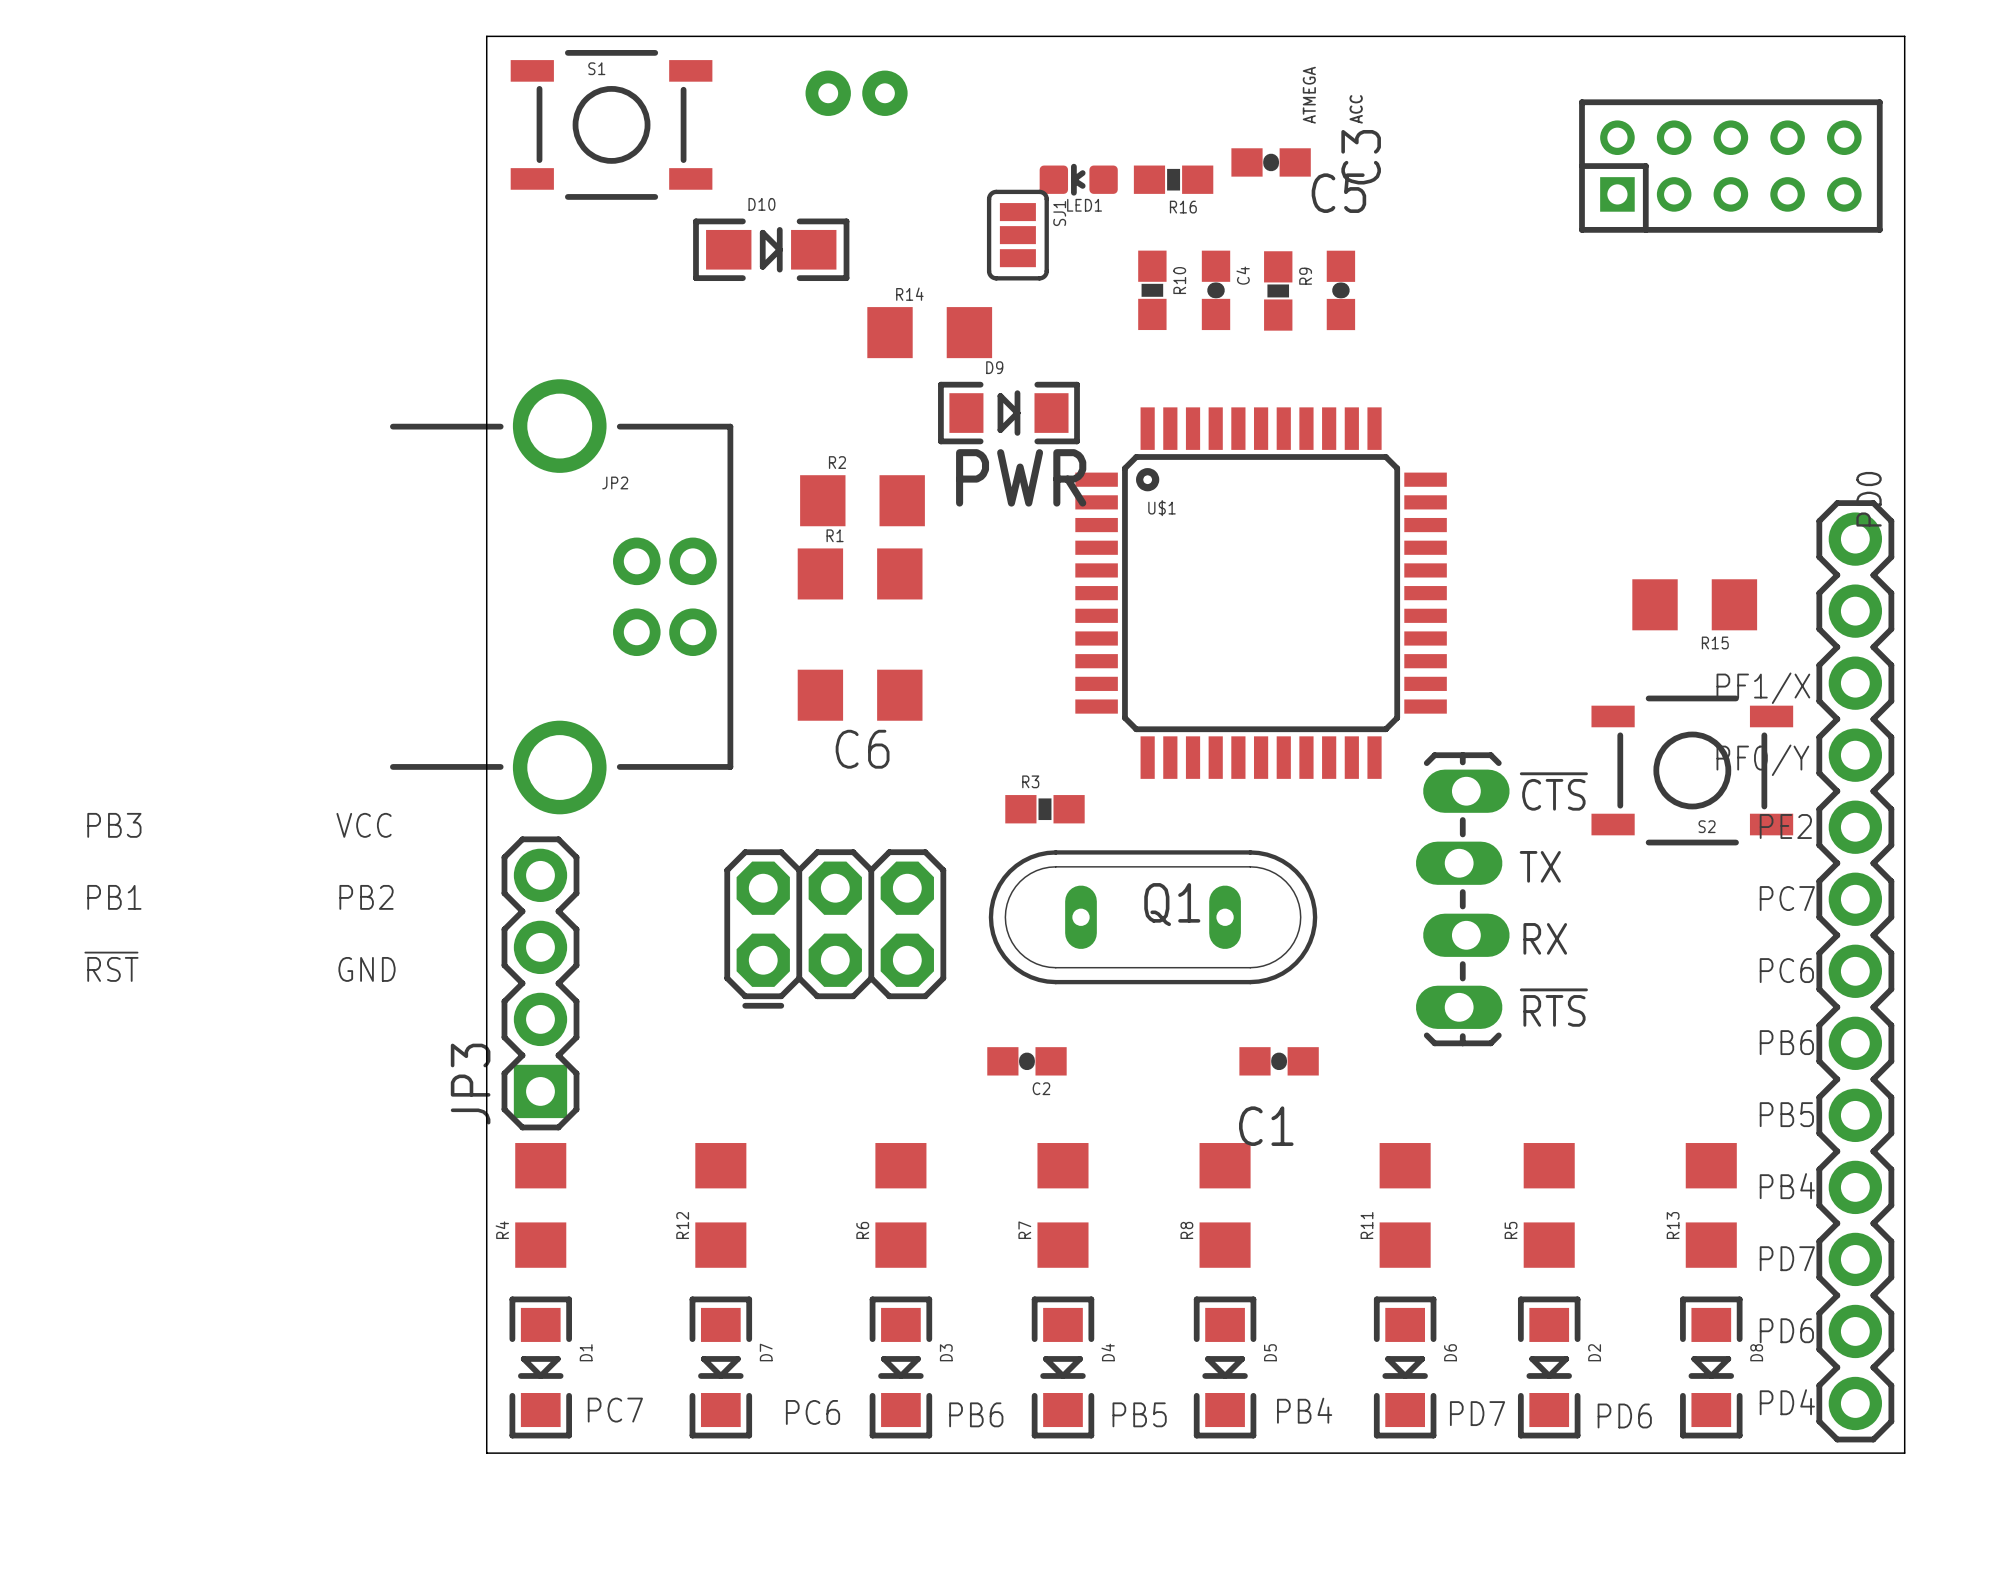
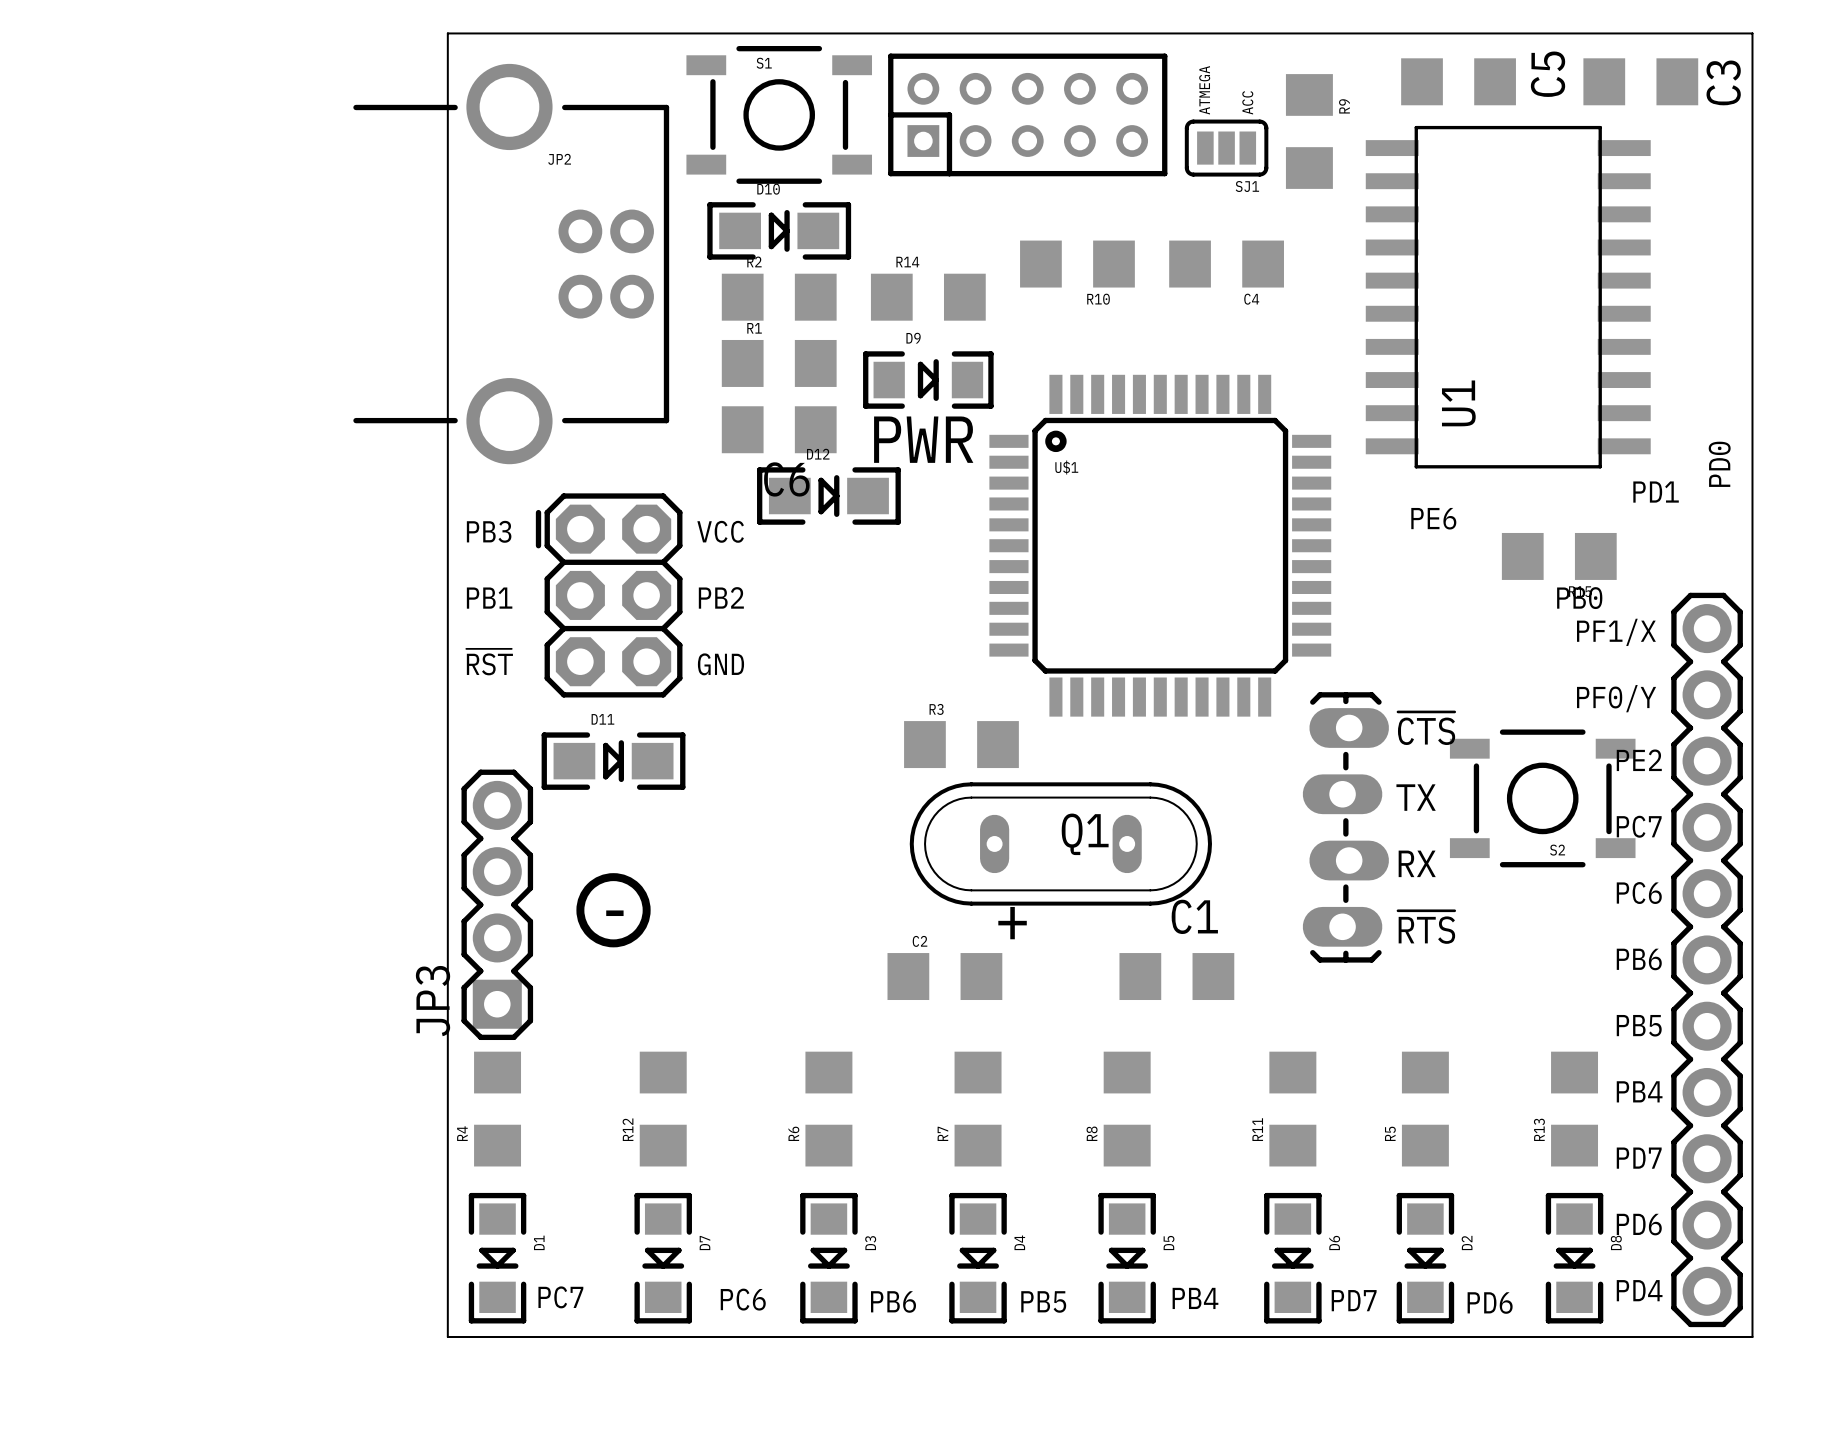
part: (856, 93) -> none
S1 position: (611, 124) -> (779, 114)
C3 footprint: [1231, 148, 1311, 177] -> [1583, 58, 1699, 106]
part position: (1730, 166) -> (1027, 114)
LED1: (1078, 179) -> none
R16: (1173, 179) -> none
C5 name position: C5 (1338, 193) -> C5 (1548, 74)
SJ1 rotation: 0° (1017, 235) -> 90° clockwise (1226, 148)
SJ1 position: (1017, 235) -> (1226, 148)
D10 position: (771, 249) -> (779, 230)
R10 footprint: [1138, 250, 1167, 331] -> [1020, 240, 1135, 288]
C4 footprint: [1201, 250, 1231, 331] -> [1169, 240, 1284, 288]
C5 footprint: [1326, 250, 1356, 331] -> [1401, 58, 1516, 106]
R9 footprint: [1264, 251, 1293, 331] -> [1285, 74, 1333, 189]
U1: none -> (1508, 297)
R14 position: (929, 332) -> (928, 297)
R2 position: (862, 500) -> (779, 297)
text: none -> PD1 (1656, 492)
D12: none -> (828, 496)
text: none -> PE6 (1433, 518)
R1 position: (860, 573) -> (779, 363)
JP2 position: (561, 596) -> (511, 264)
text: none -> PB0 (1579, 598)
C6 position: (860, 695) -> (779, 429)
S2 position: (1692, 770) -> (1542, 798)
R3 footprint: [1005, 795, 1085, 824] -> [904, 721, 1019, 769]
text position: PB3 (114, 825) -> PB3 (489, 531)
text position: VCC (364, 825) -> VCC (720, 531)
D11: none -> (613, 761)
text position: PB1 (114, 897) -> PB1 (489, 598)
text position: PB2 (366, 897) -> PB2 (721, 597)
part rotation: 0° (835, 928) -> 90° clockwise (609, 595)
part position: (835, 928) -> (609, 595)
drawing: none -> [576, 873, 651, 948]
text position: ~{RST} (111, 966) -> ~{RST} (489, 662)
text position: GND (367, 969) -> GND (720, 664)
part: (1855, 971) -> none
text: none -> - (614, 913)
text: none -> + (1012, 923)
part: none -> (1707, 959)
C2 footprint: [987, 1047, 1067, 1076] -> [887, 953, 1003, 1001]
C1 footprint: [1239, 1047, 1319, 1076] -> [1119, 953, 1235, 1001]
C2 name position: C2 (1041, 1088) -> C2 (920, 941)
C1 name position: C1 (1266, 1126) -> C1 (1194, 916)

